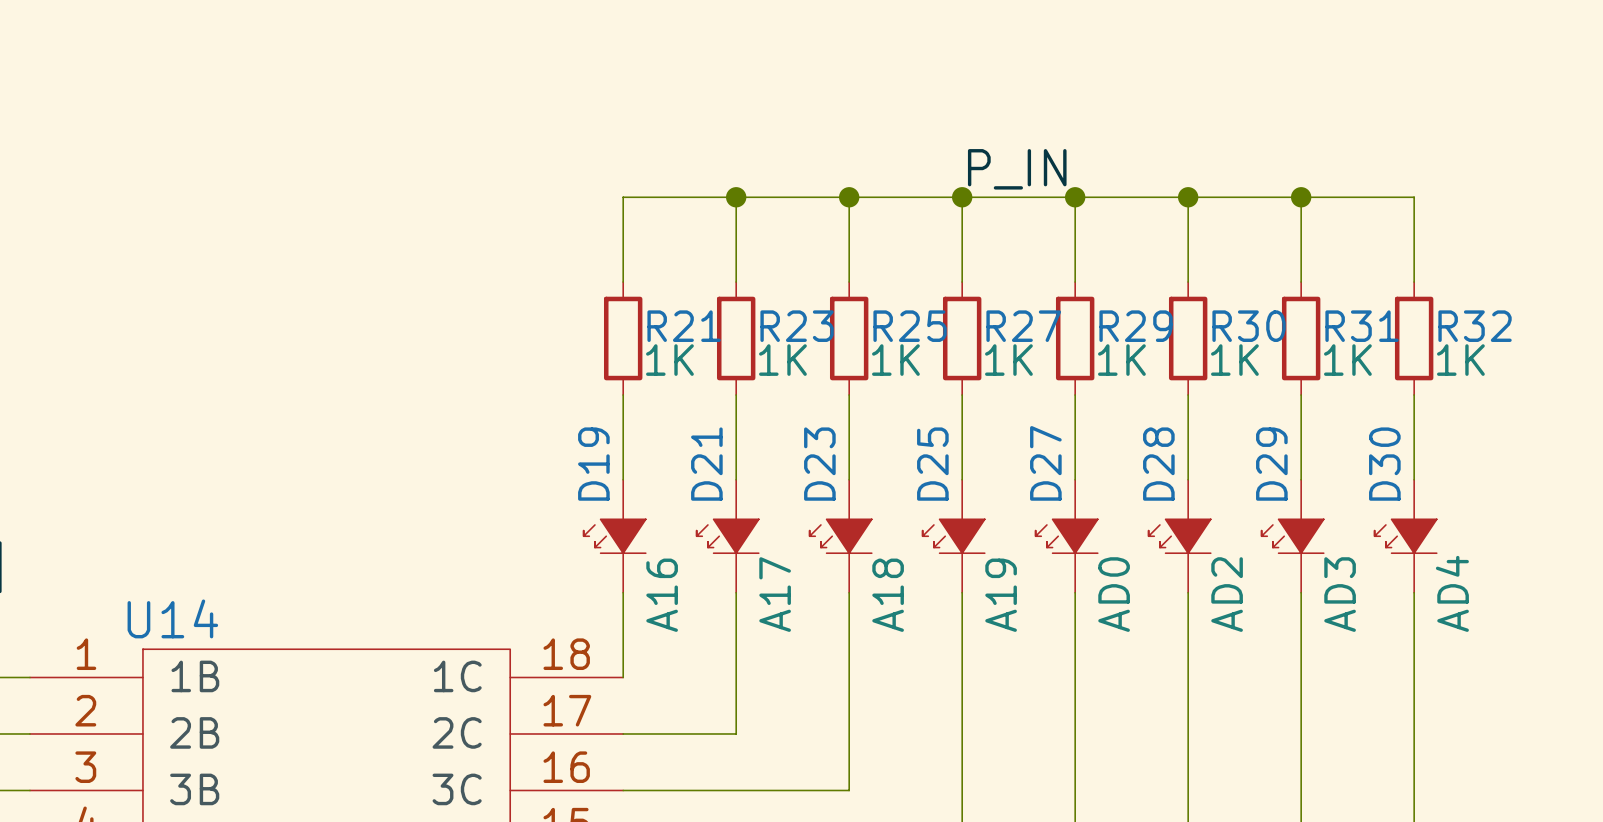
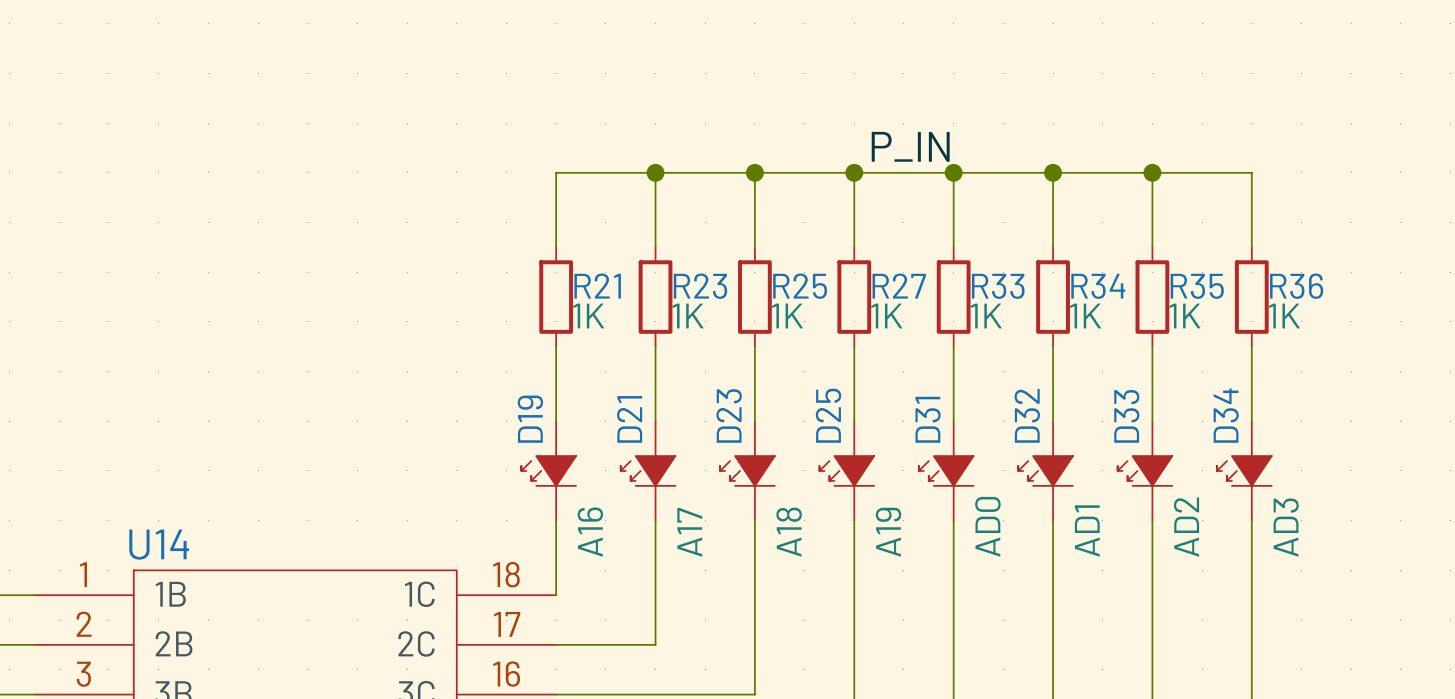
R29 name: R29 (1136, 326) -> R33 (998, 286)
R30 name: R30 (1249, 326) -> R34 (1098, 286)
R31 name: R31 (1362, 326) -> R35 (1197, 286)
R32 name: R32 (1475, 326) -> R36 (1296, 286)
D27 name: D27 (1045, 463) -> D31 (928, 419)
D28 name: D28 (1158, 464) -> D32 (1027, 415)
D29 name: D29 (1271, 464) -> D33 (1126, 416)
D30 name: D30 (1384, 464) -> D34 (1226, 415)
D30 value: AD4 (1452, 593) -> AD3 (1286, 527)
D28 value: AD2 (1227, 594) -> AD1 (1087, 531)
D29 value: AD3 (1340, 594) -> AD2 (1186, 527)

